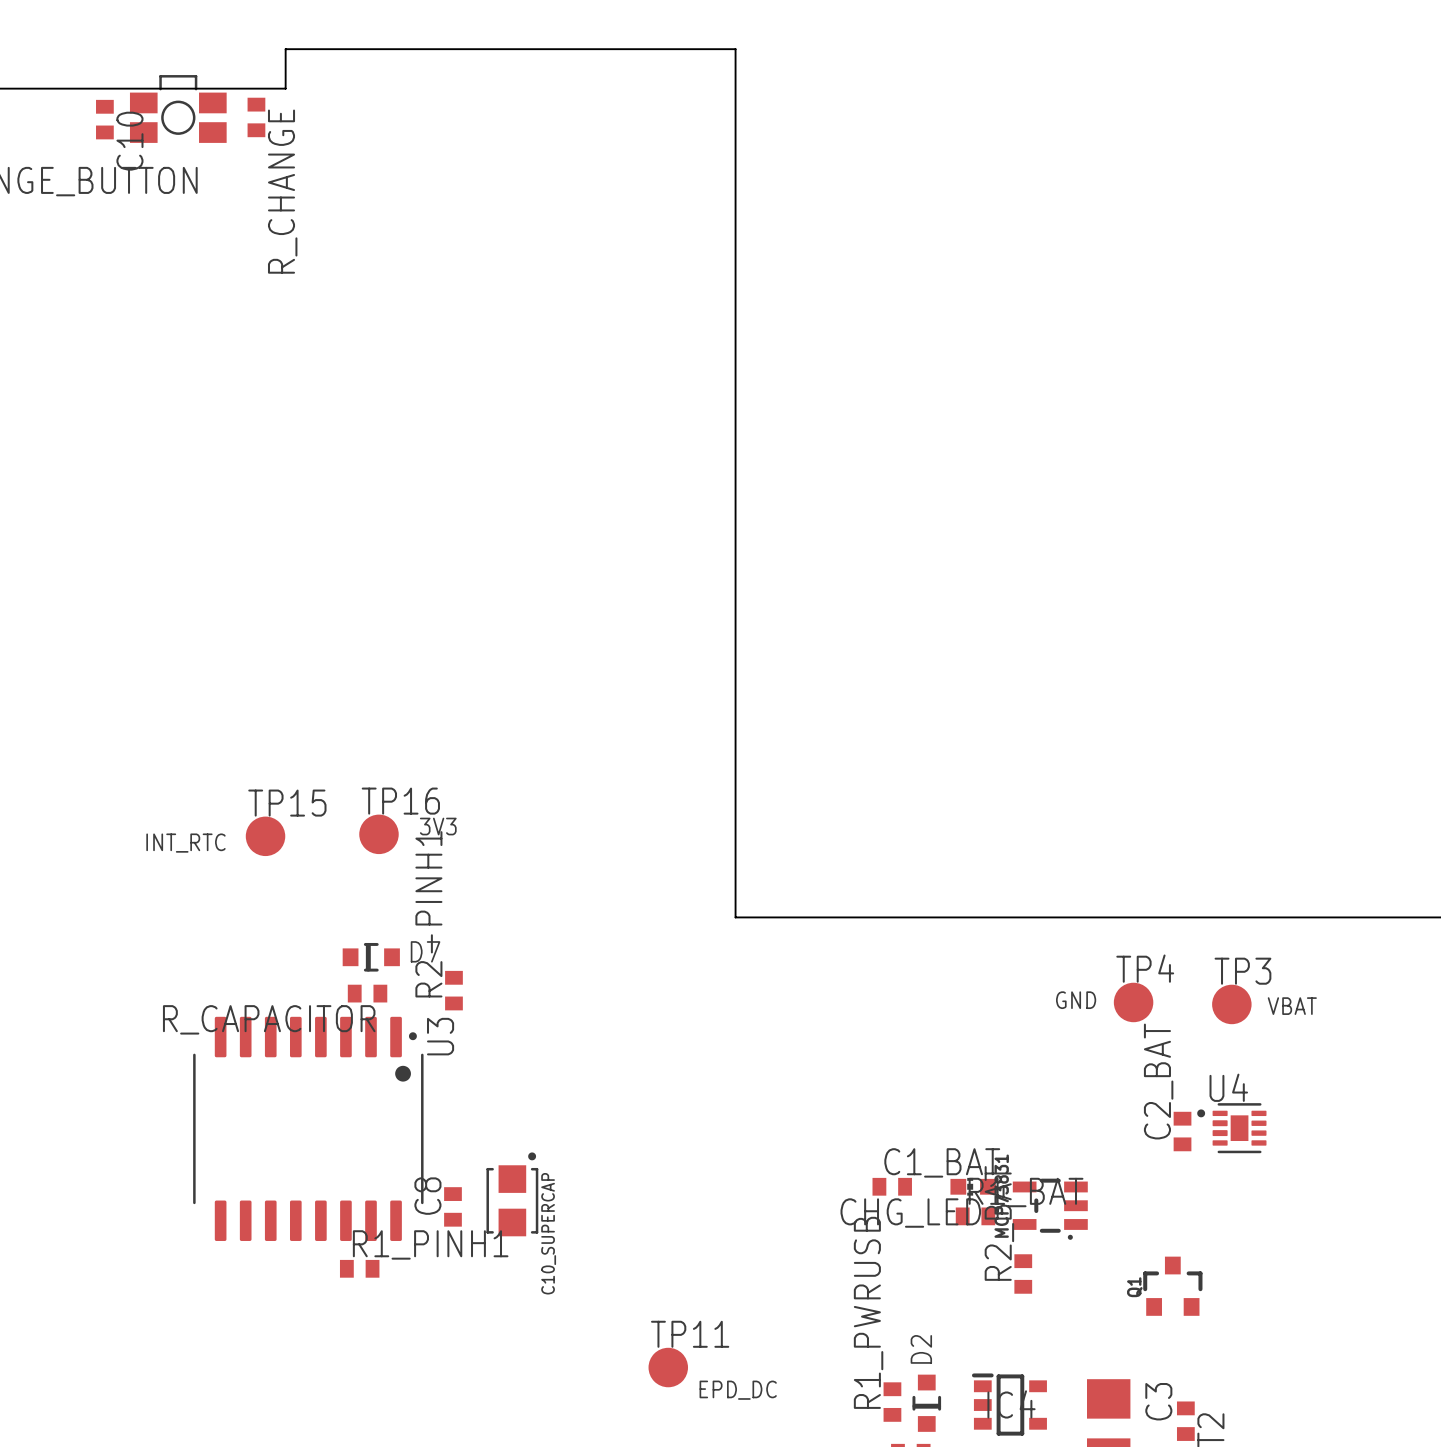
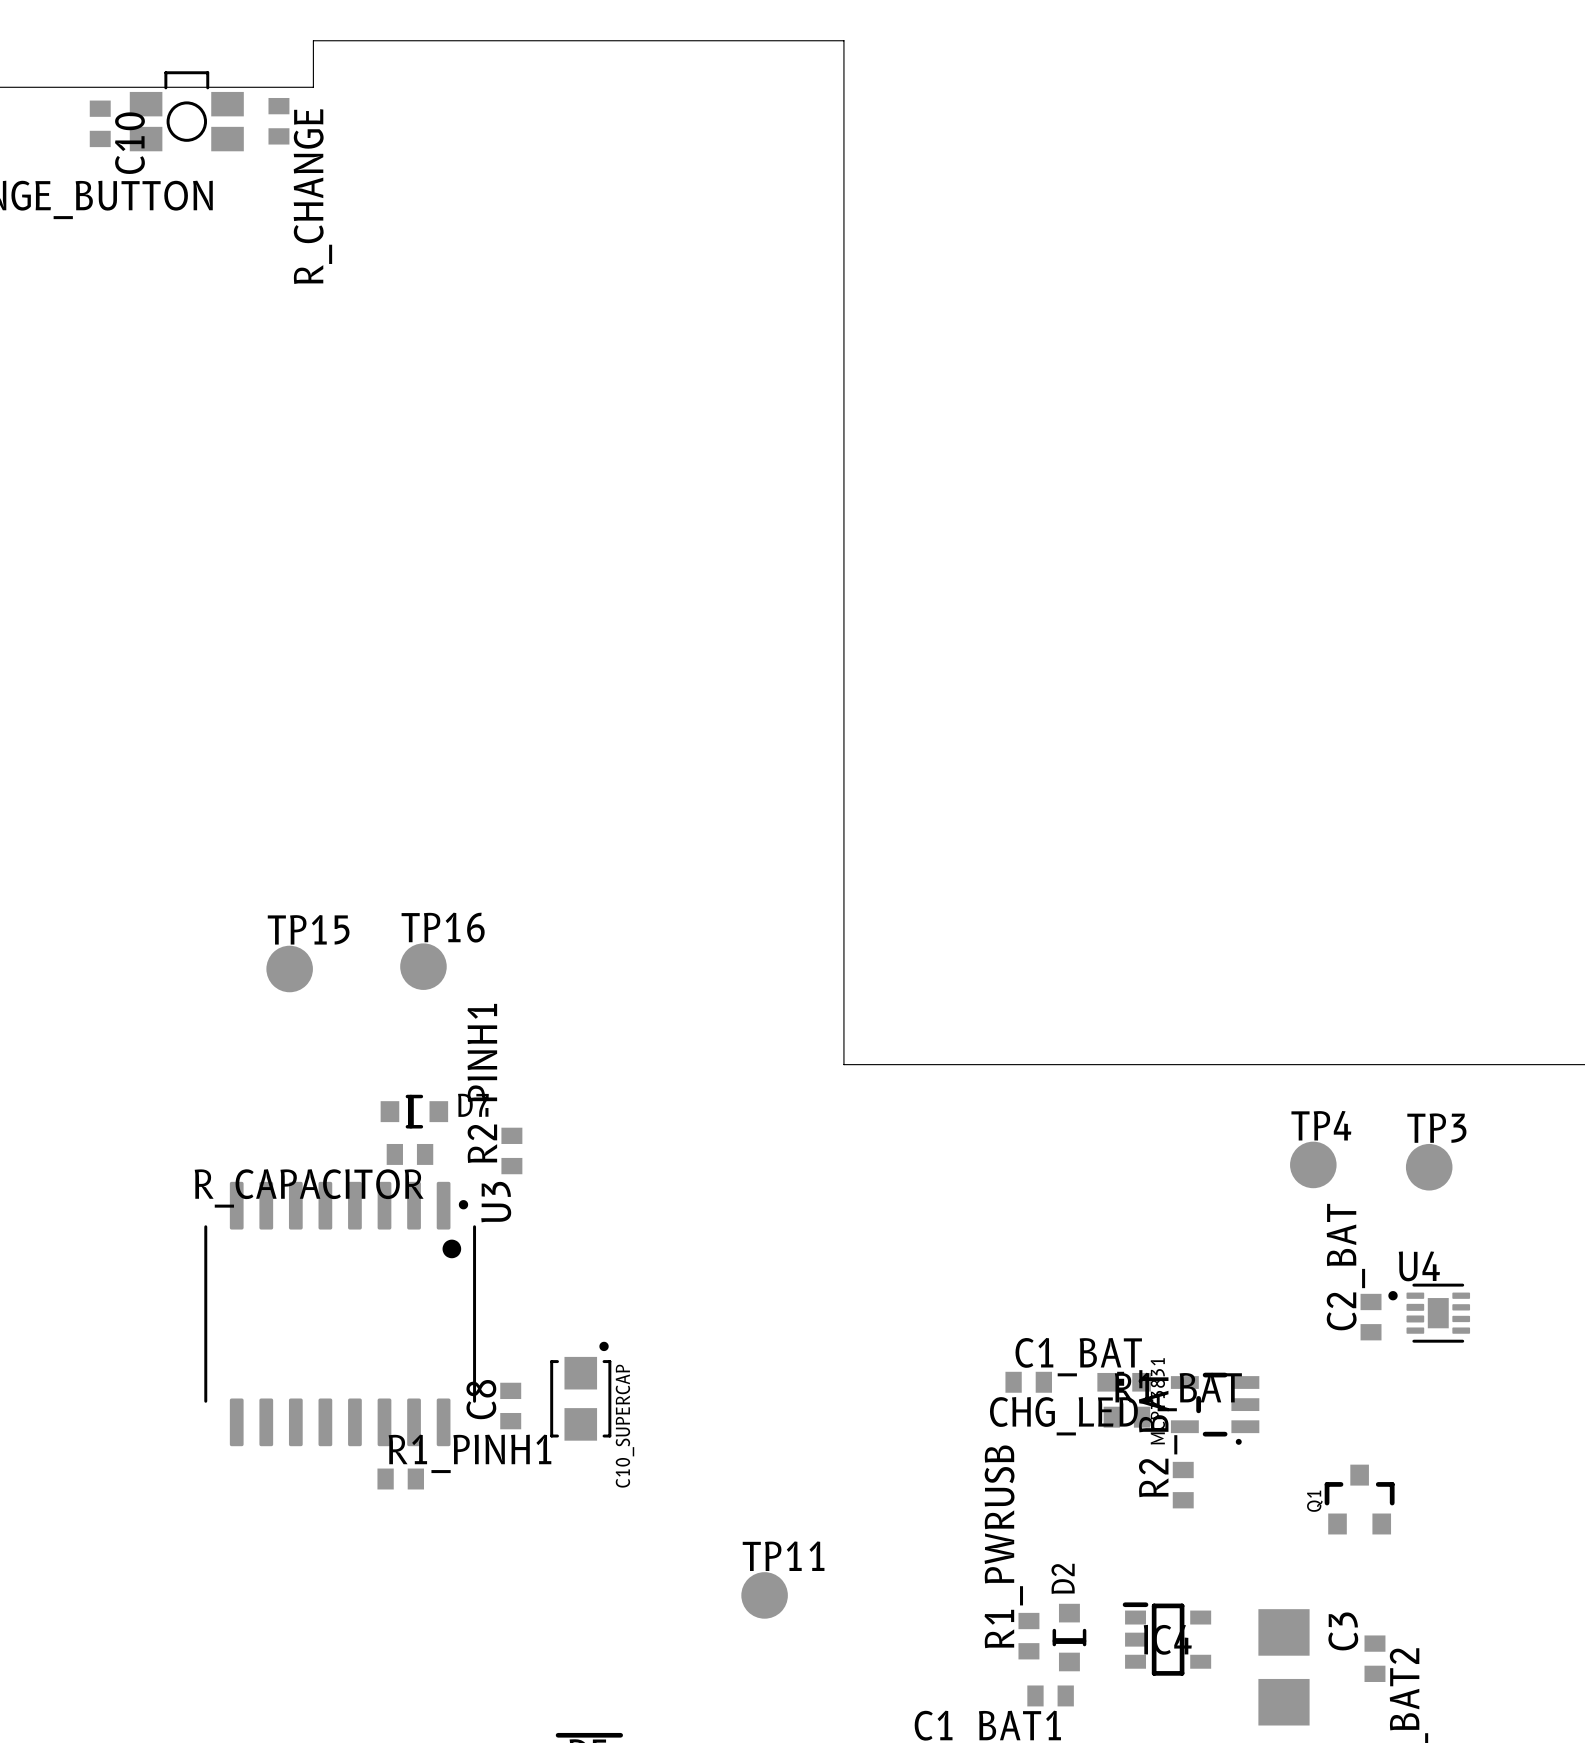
text: 3V3 (438, 826) -> none
text: INT_RTC (185, 843) -> none
text: GND (1076, 1000) -> none
text: VBAT (1292, 1006) -> none
text: EPD_DC (738, 1390) -> none

